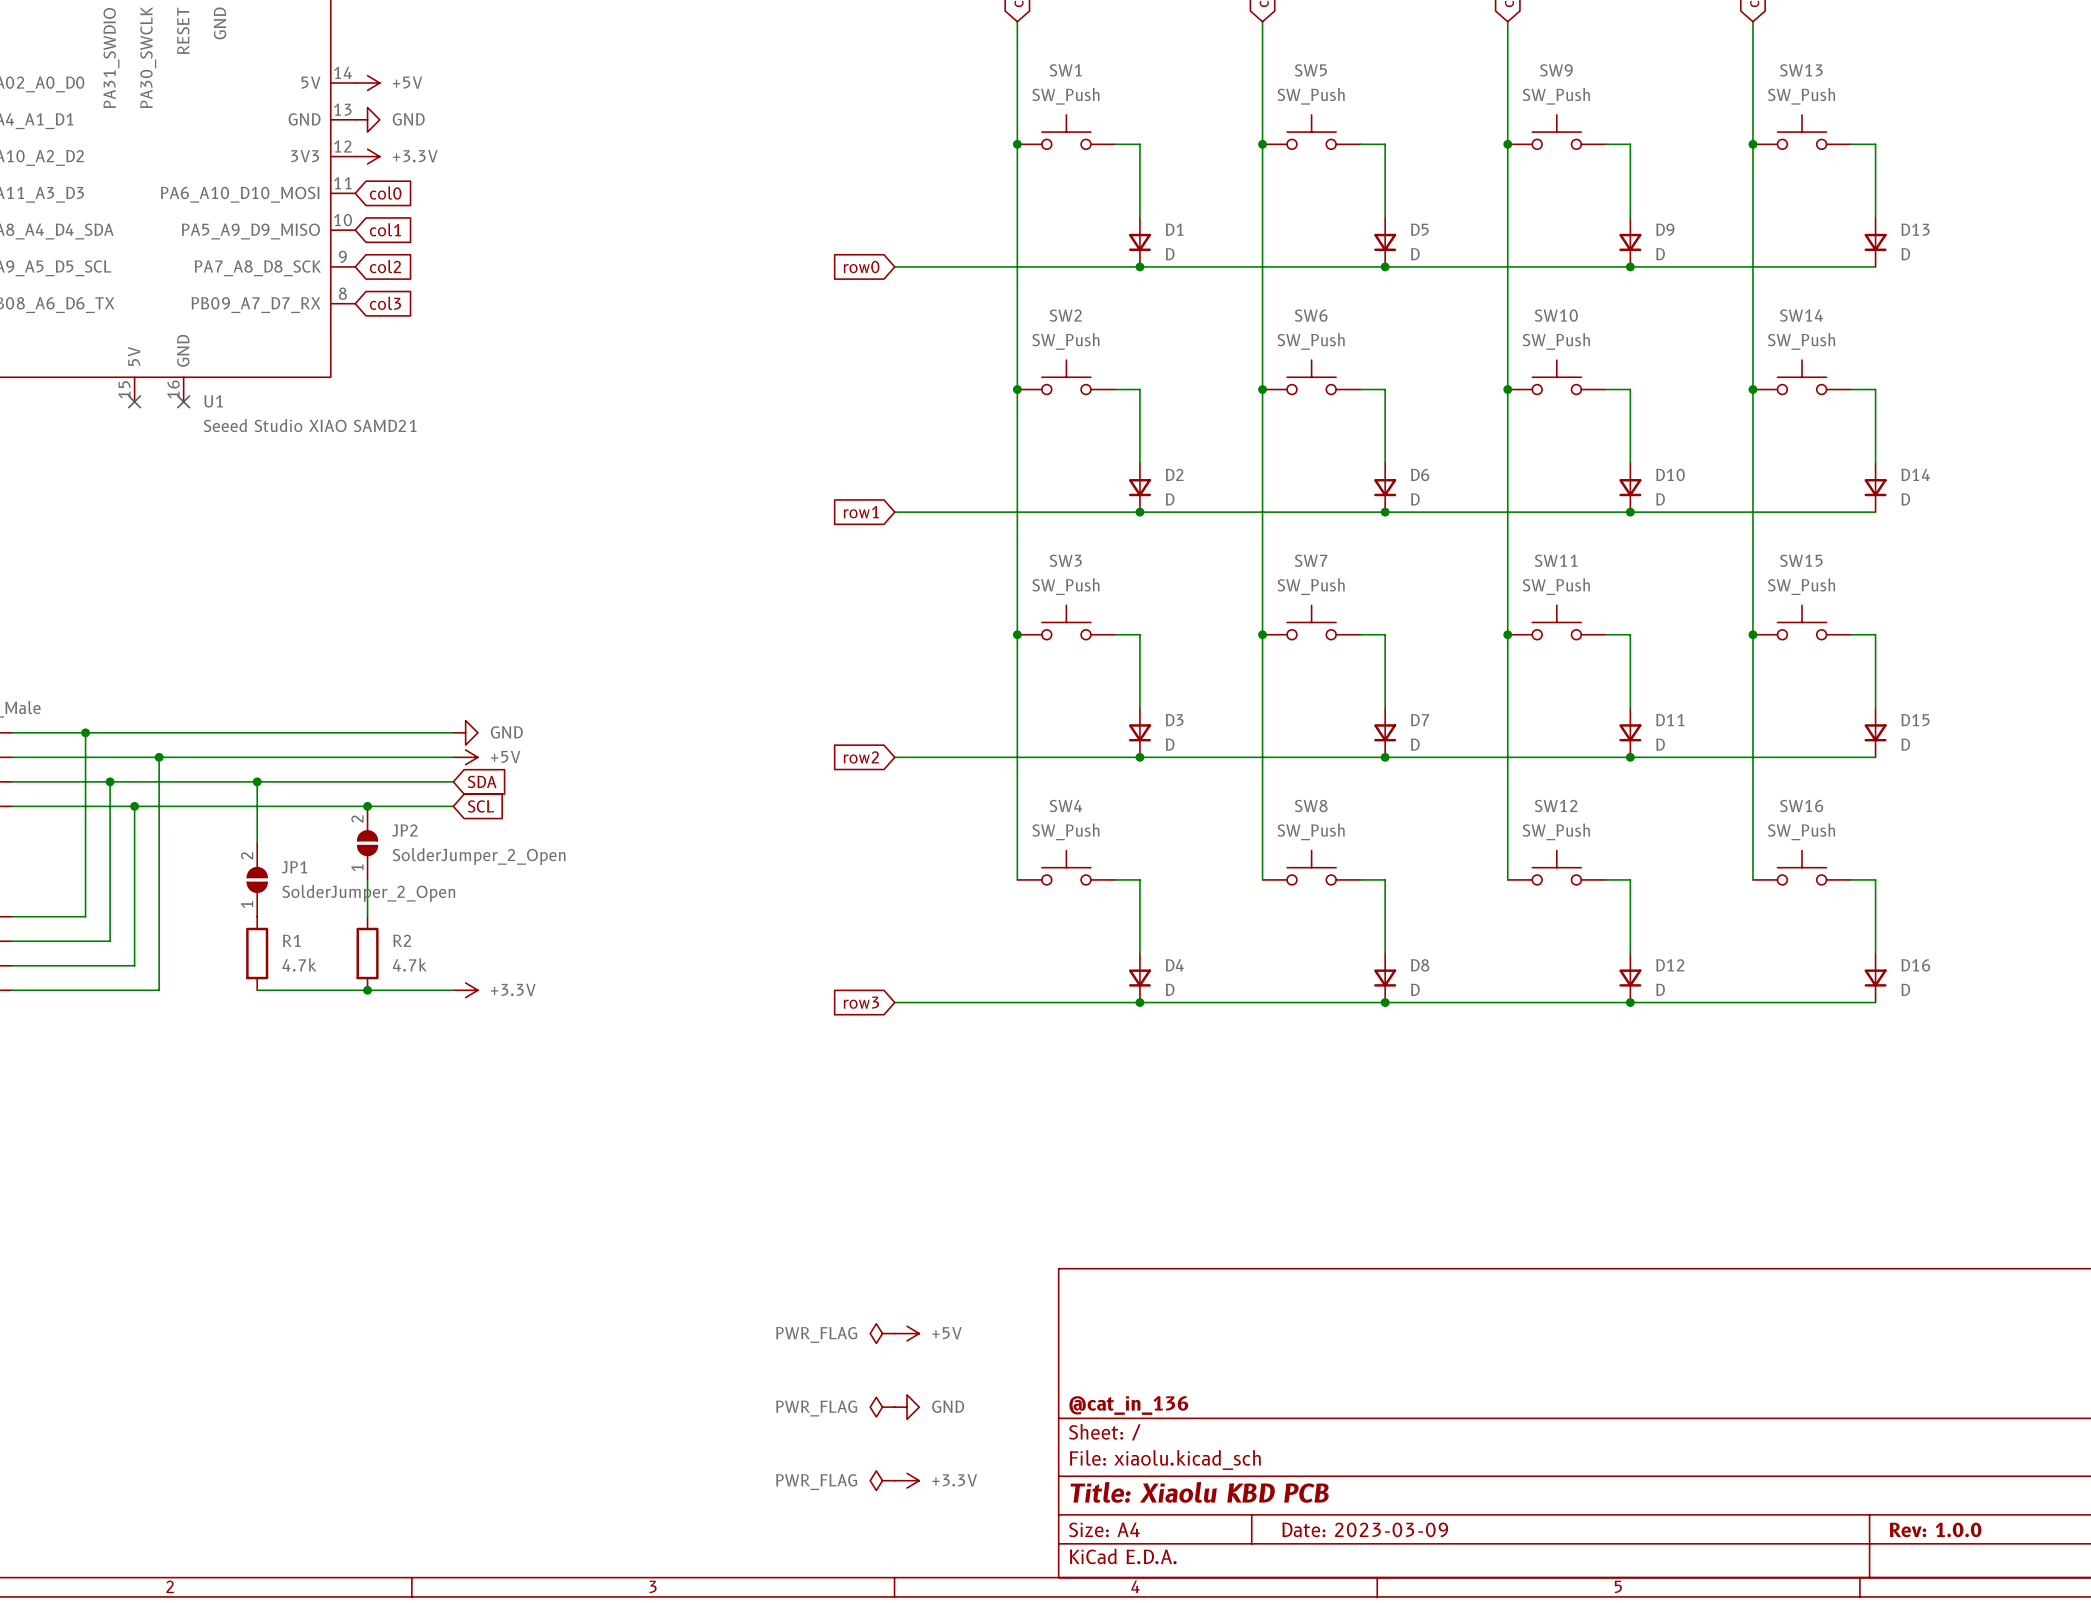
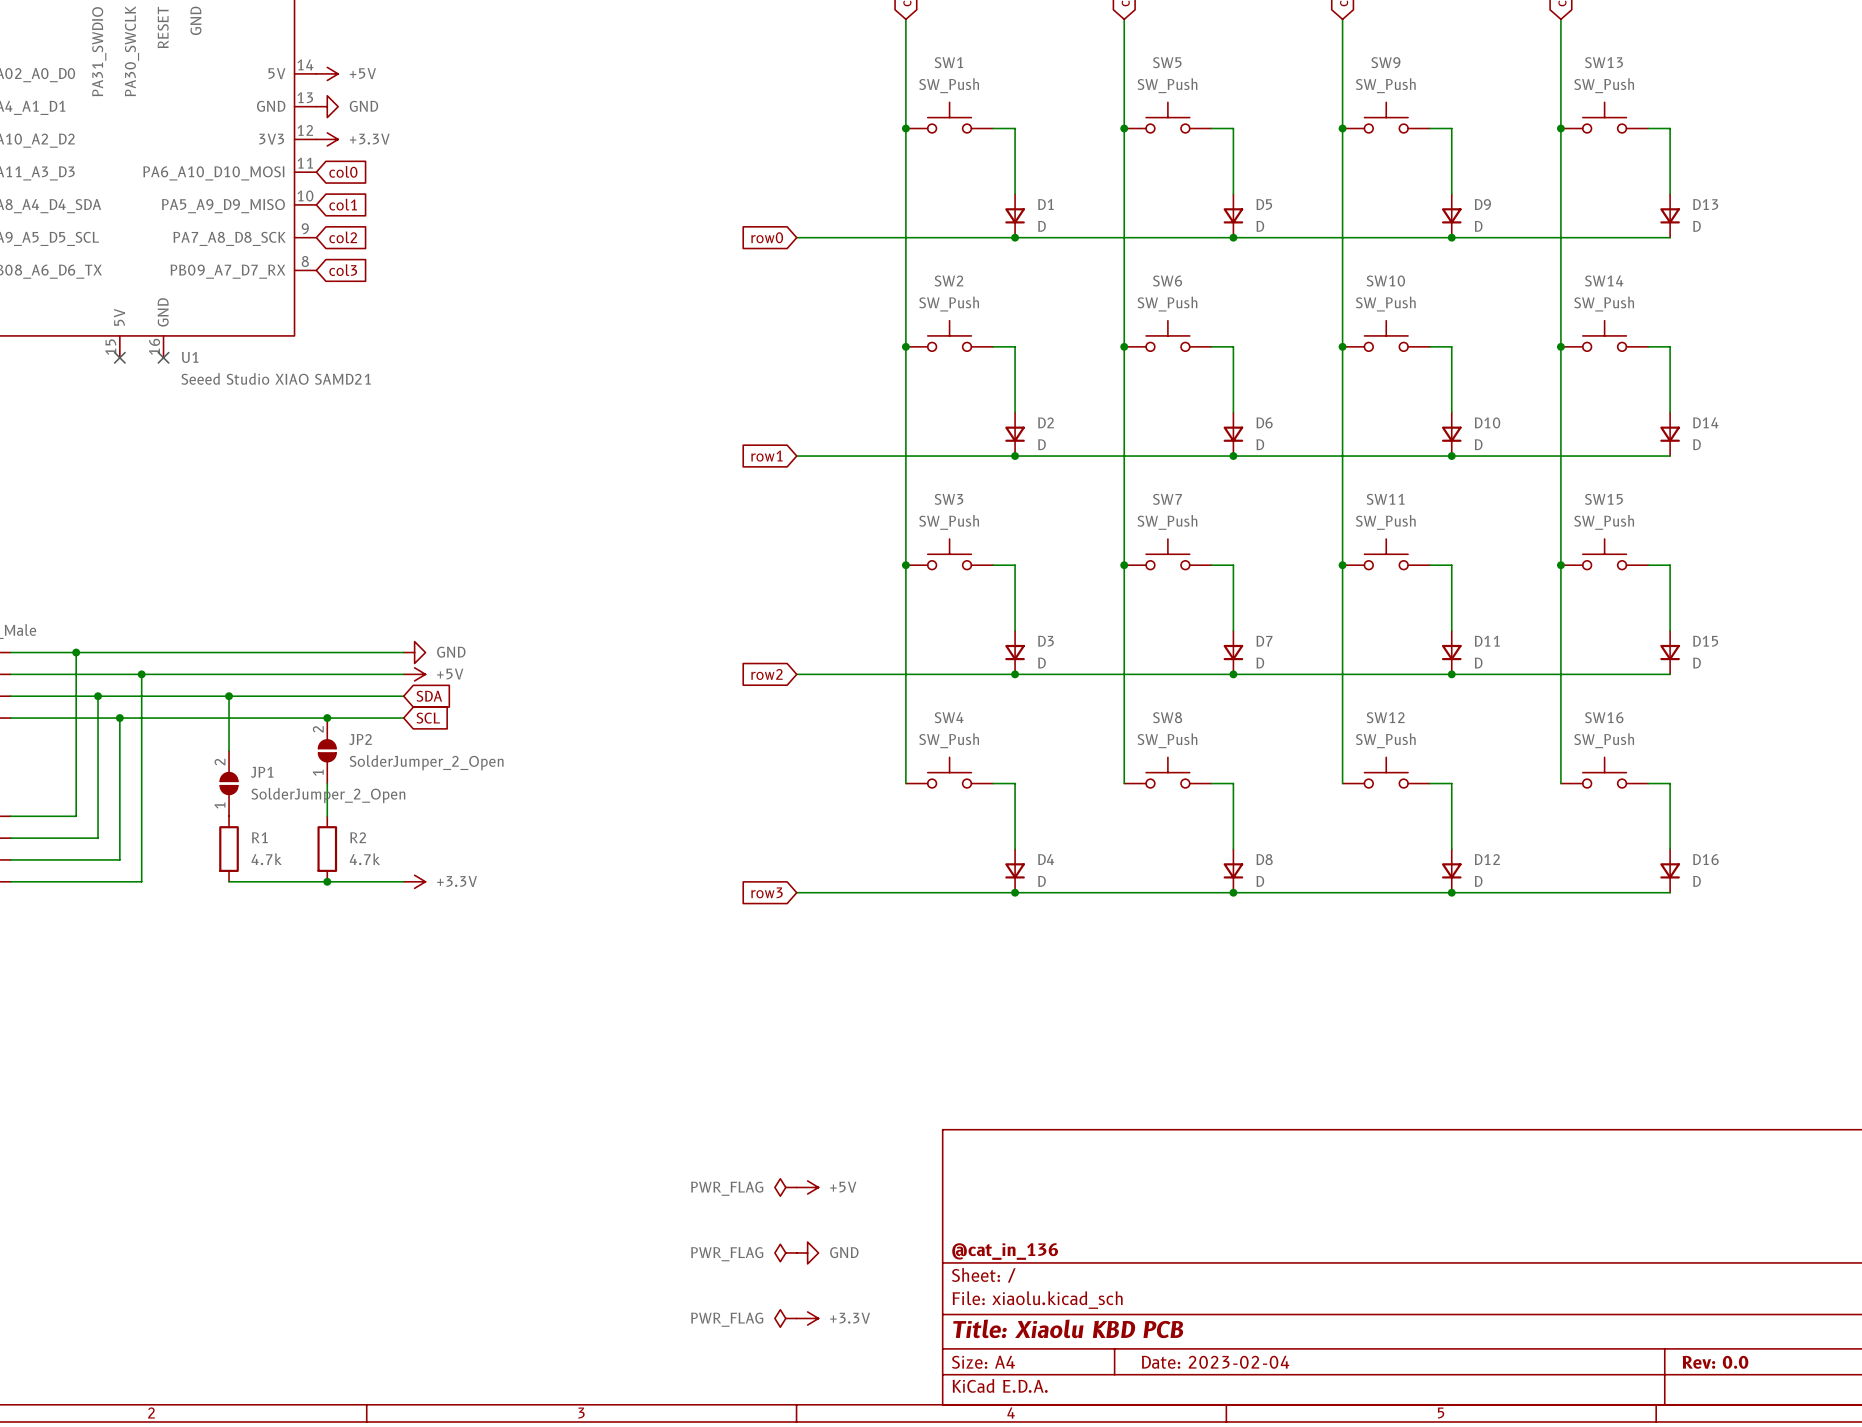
title block: Date: 2023-03-09 (1365, 1529) -> Date: 2023-02-04 (1215, 1362)
title block: Rev: 1.0.0 (1935, 1529) -> Rev: 0.0 (1715, 1362)

